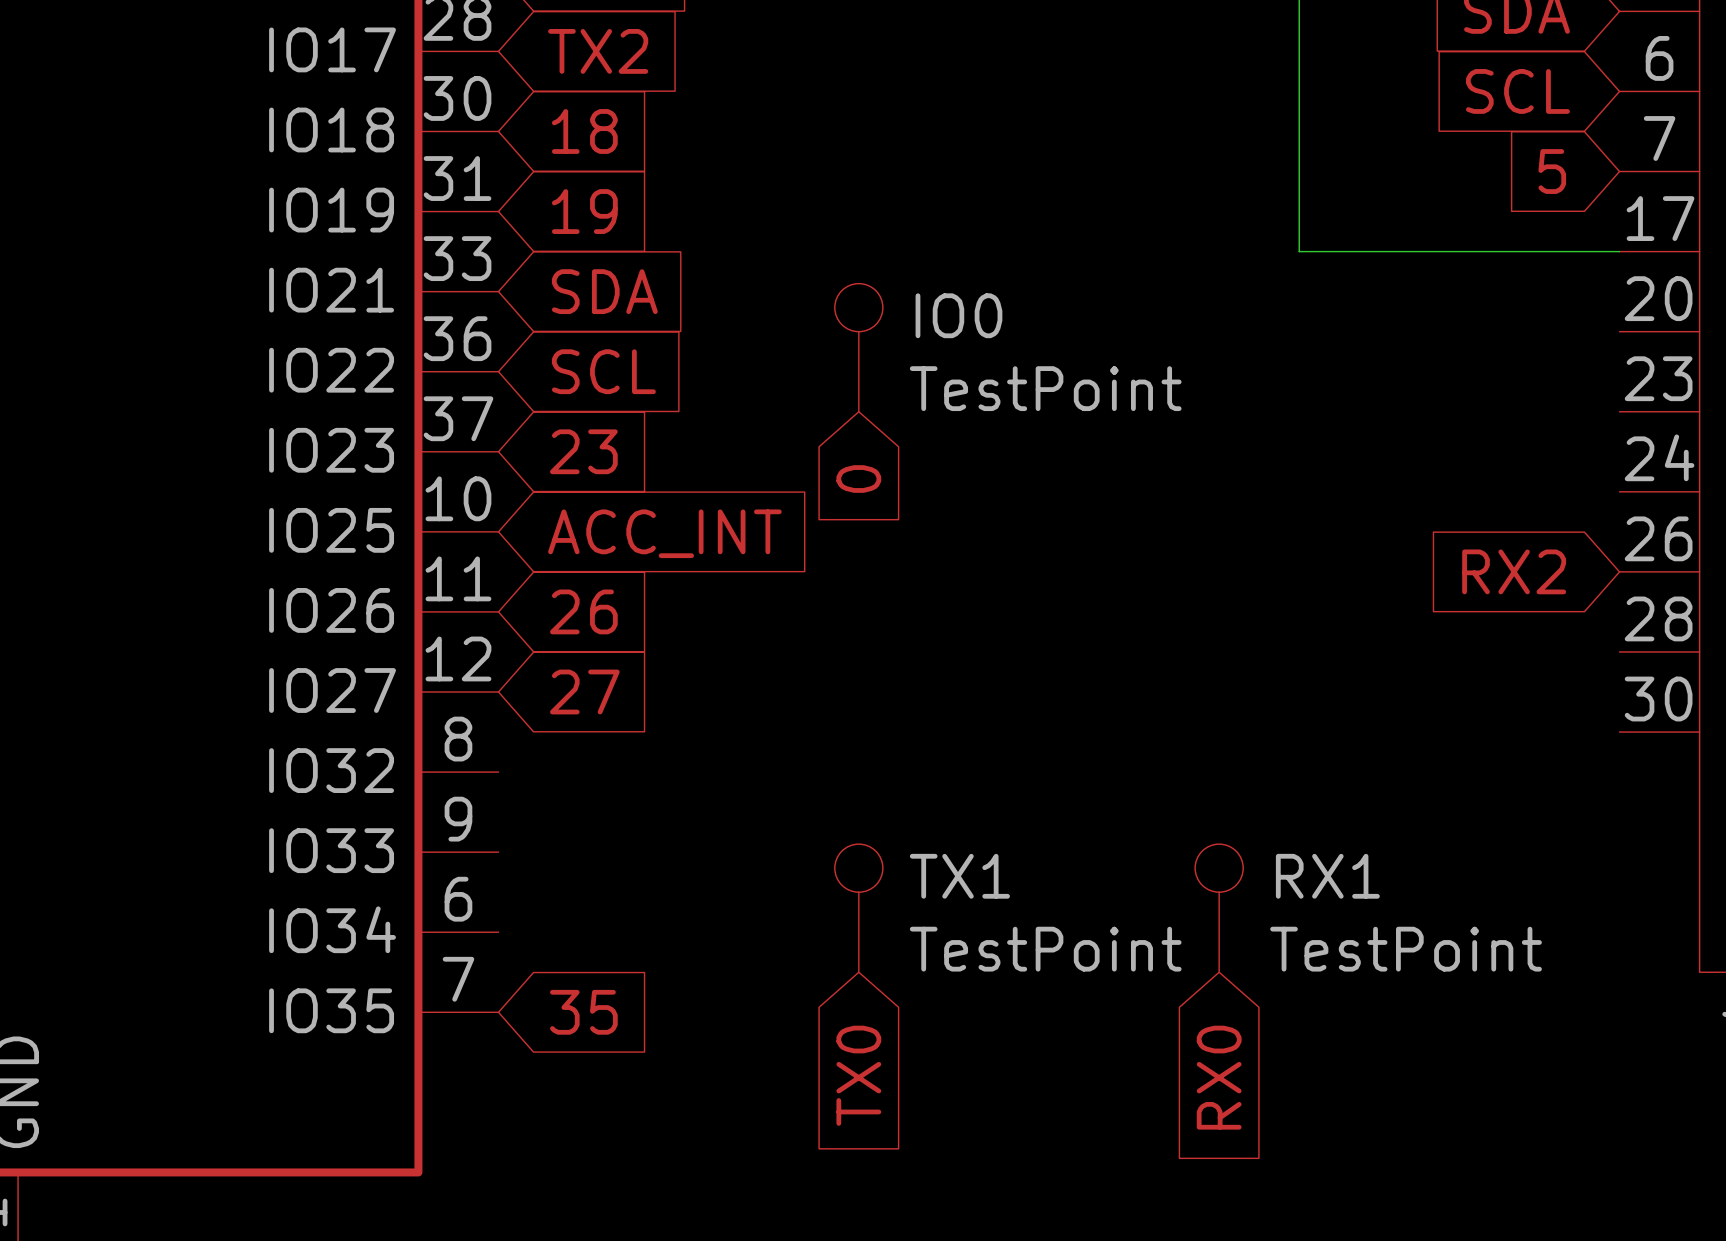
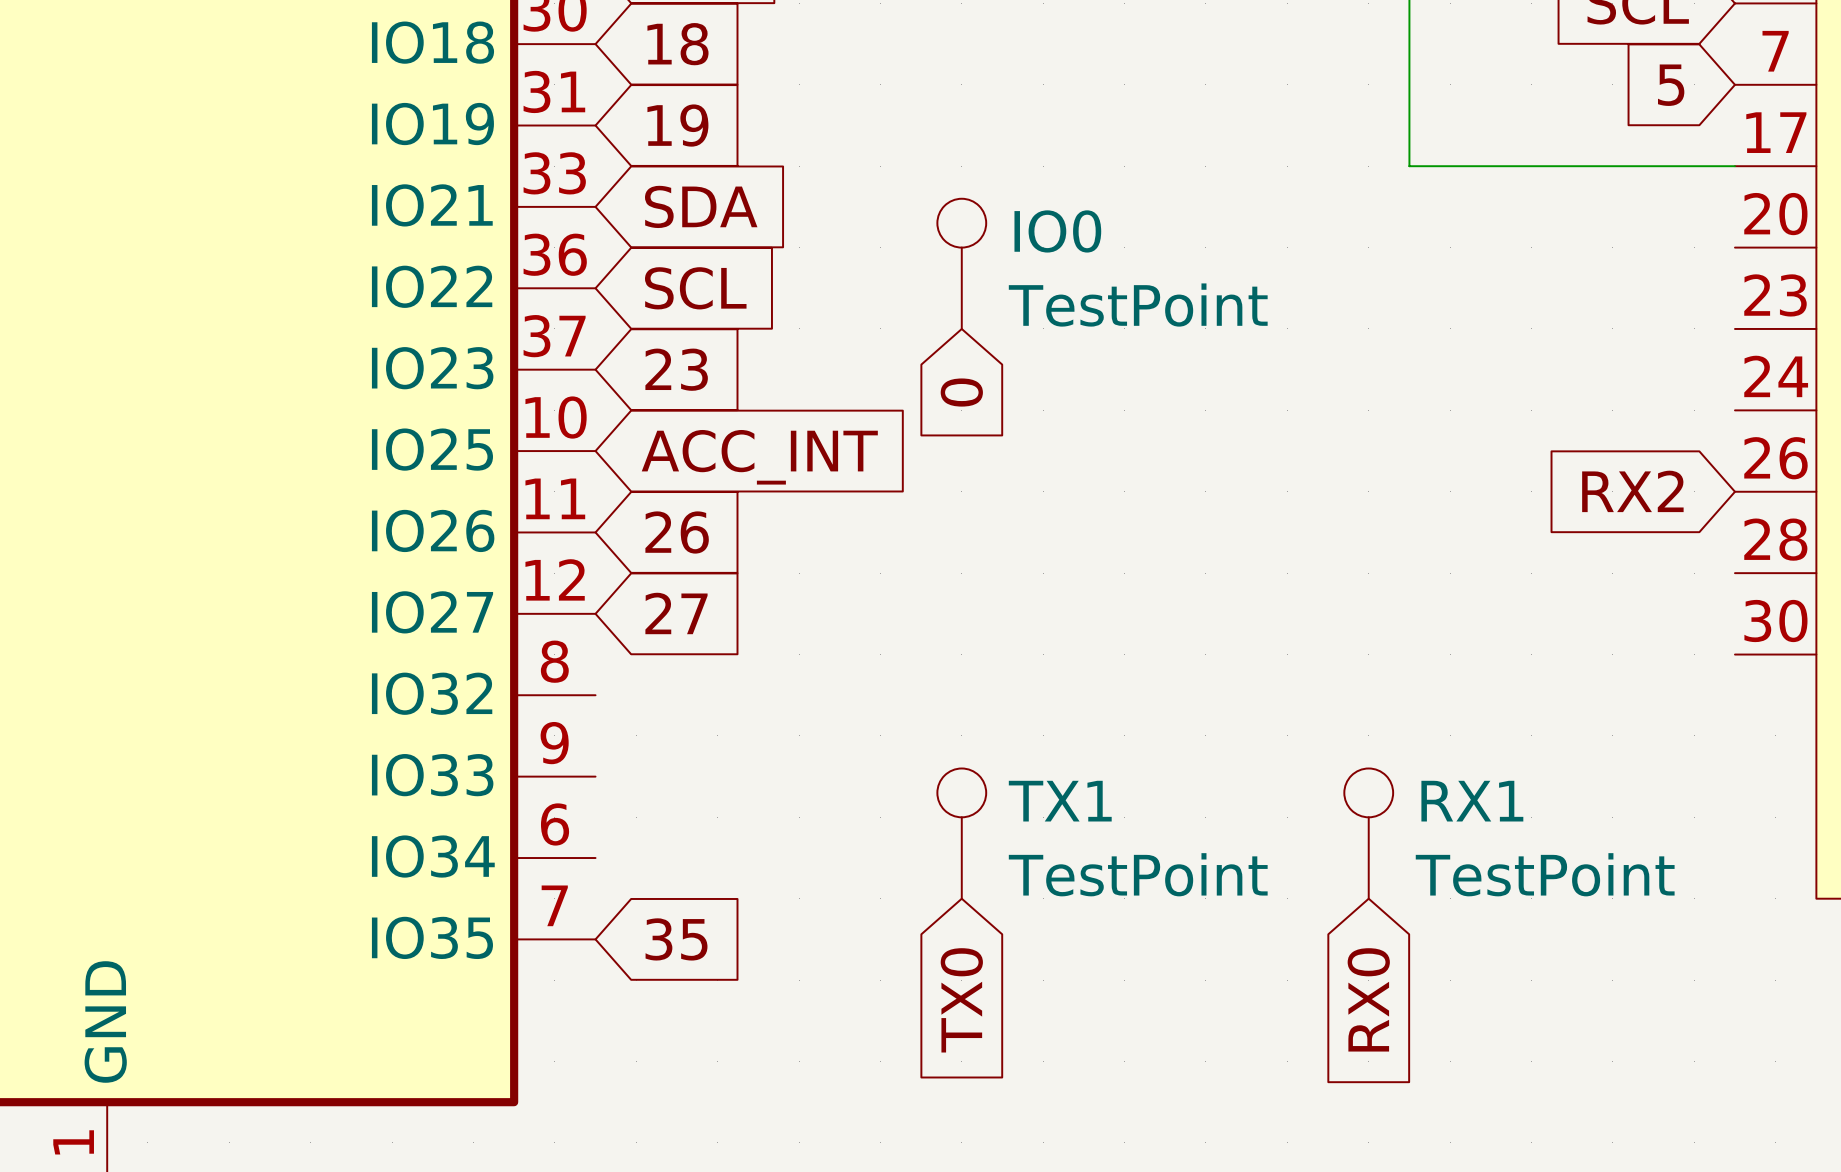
RX1 position: (1219, 908) -> (1368, 833)
global label position: RX0 (1219, 1077) -> RX0 (1368, 999)

